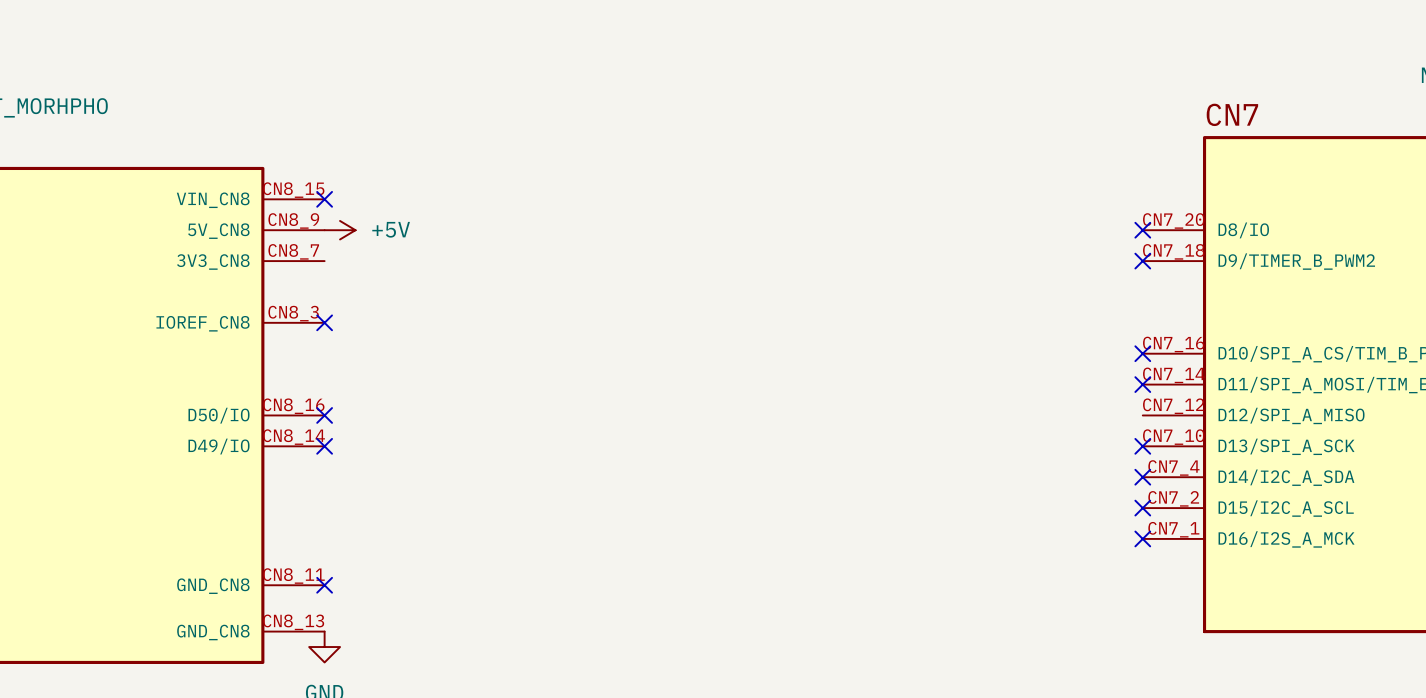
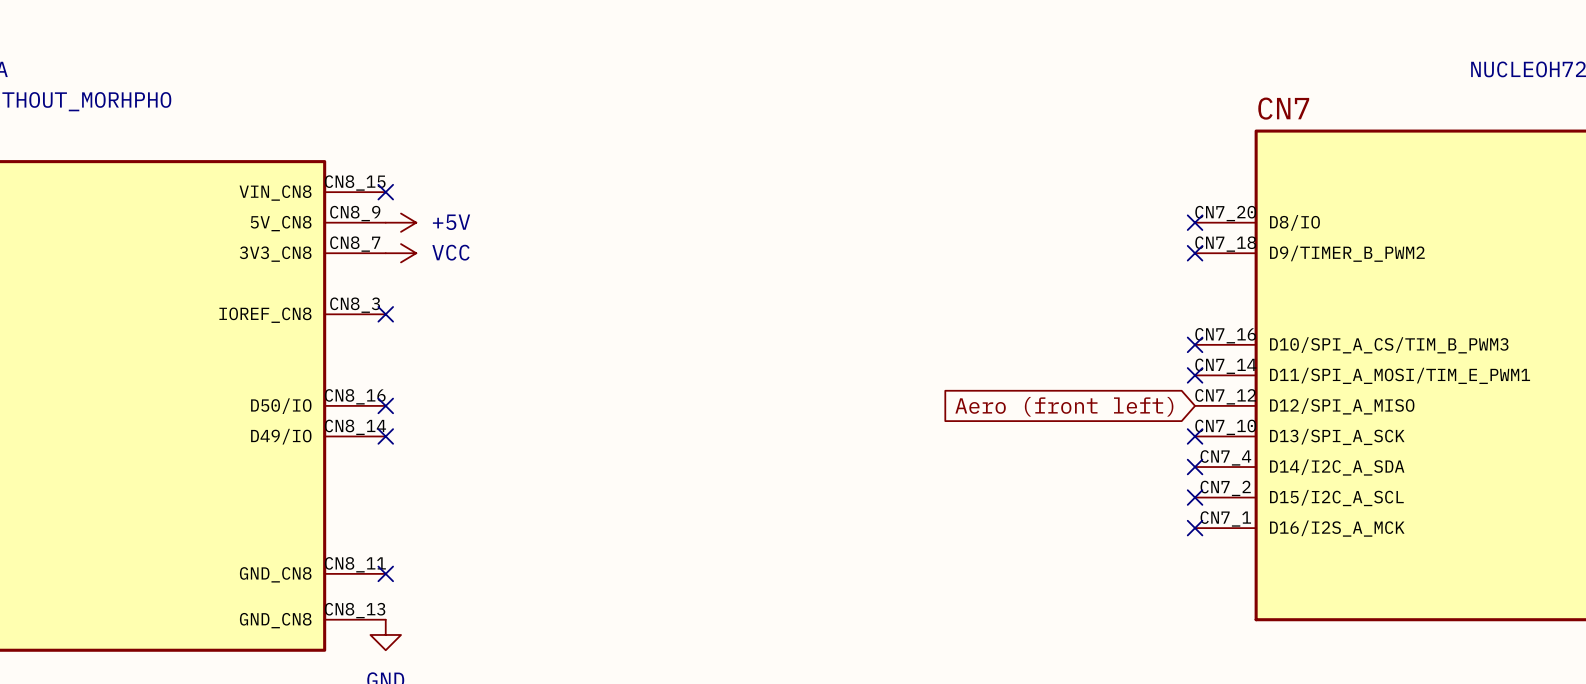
power symbol: none -> VCC (401, 253)
global label: none -> Aero (front left) (1064, 406)

